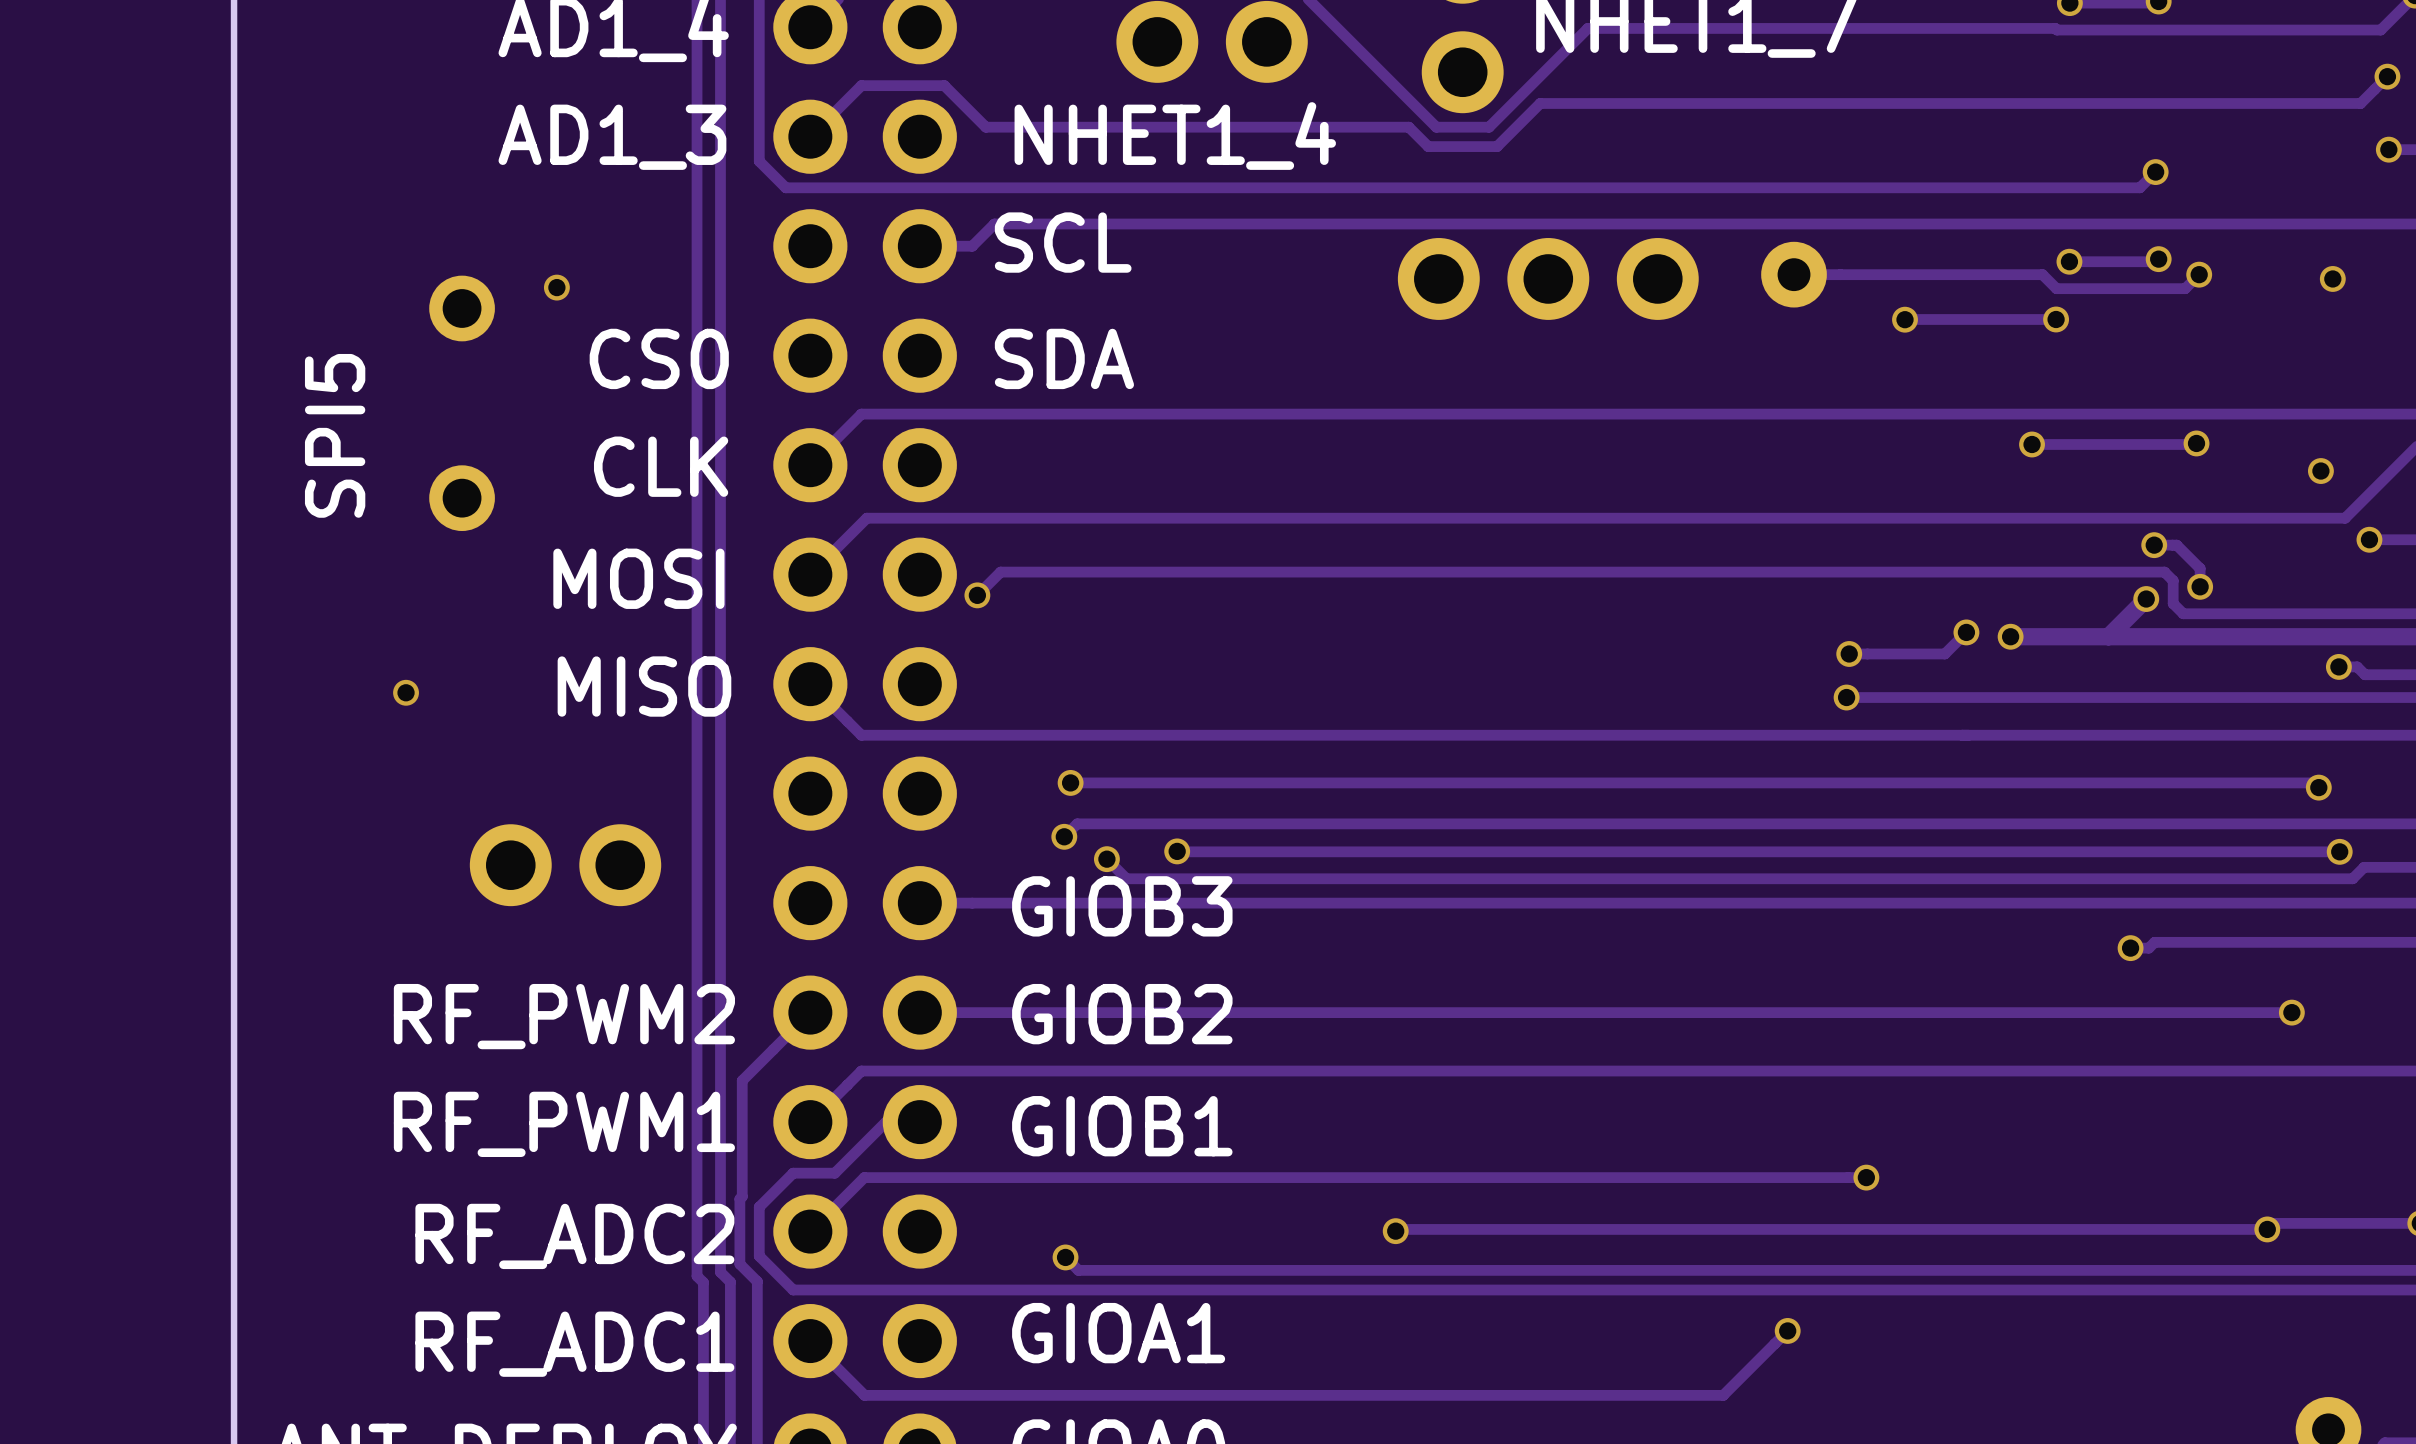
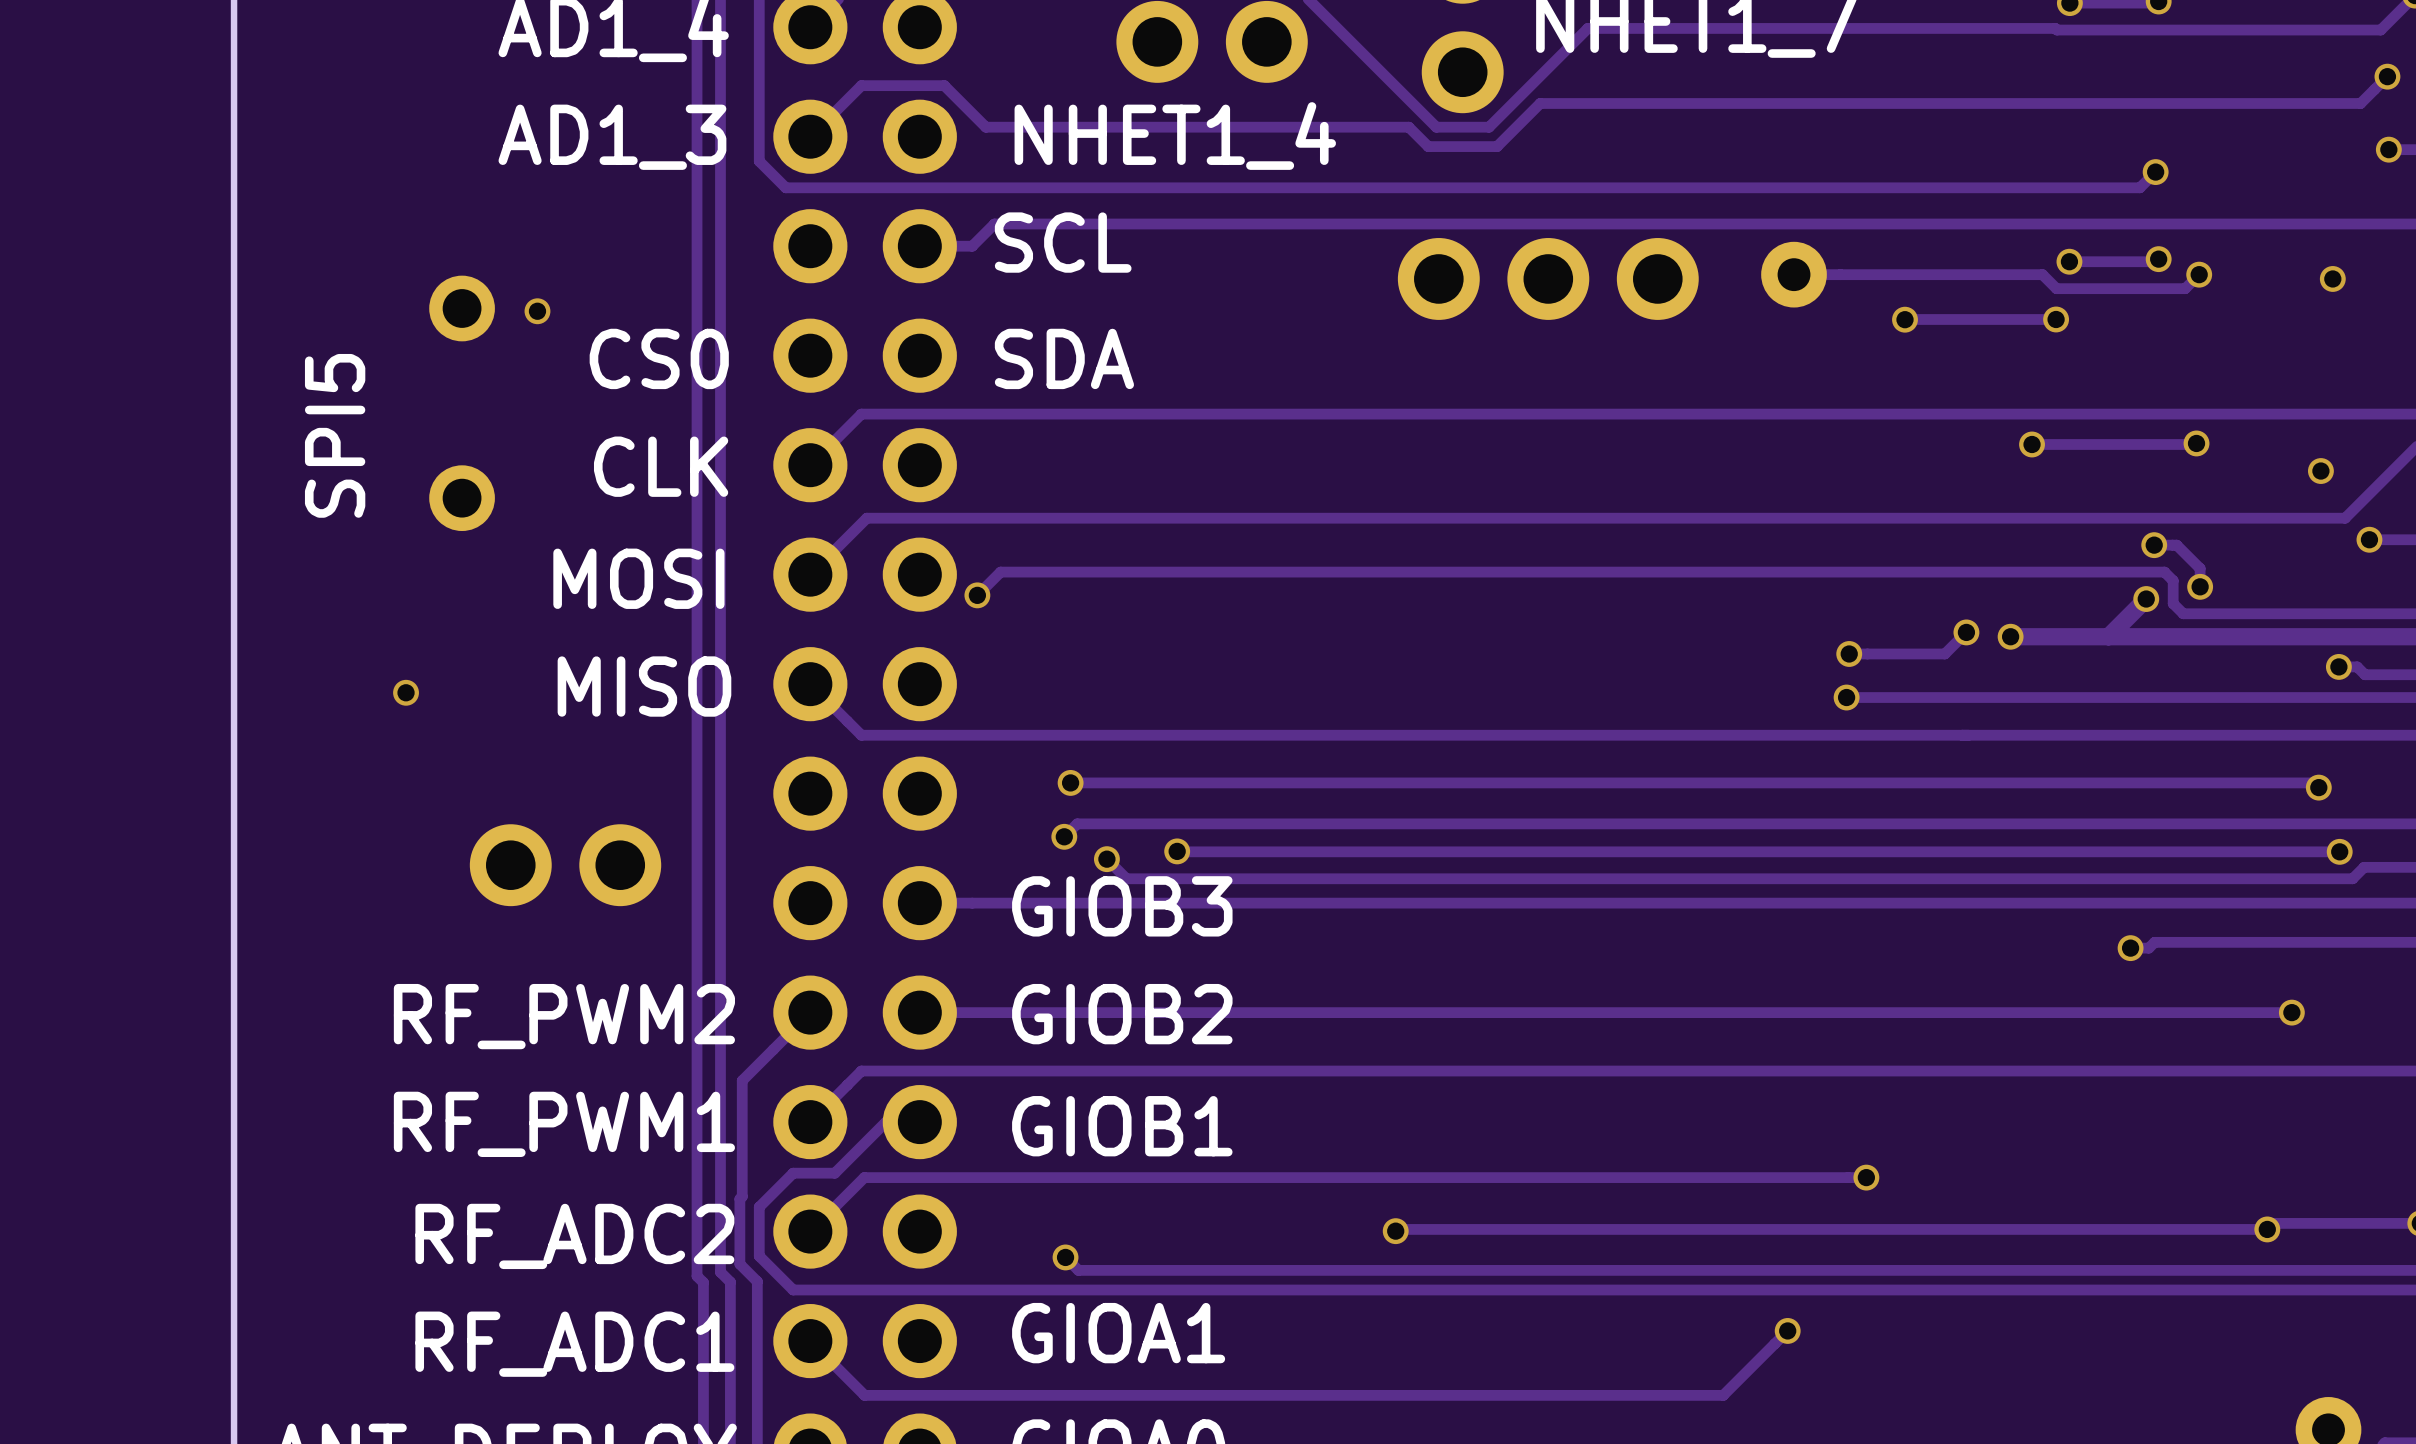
via position: (556, 287) -> (537, 311)

